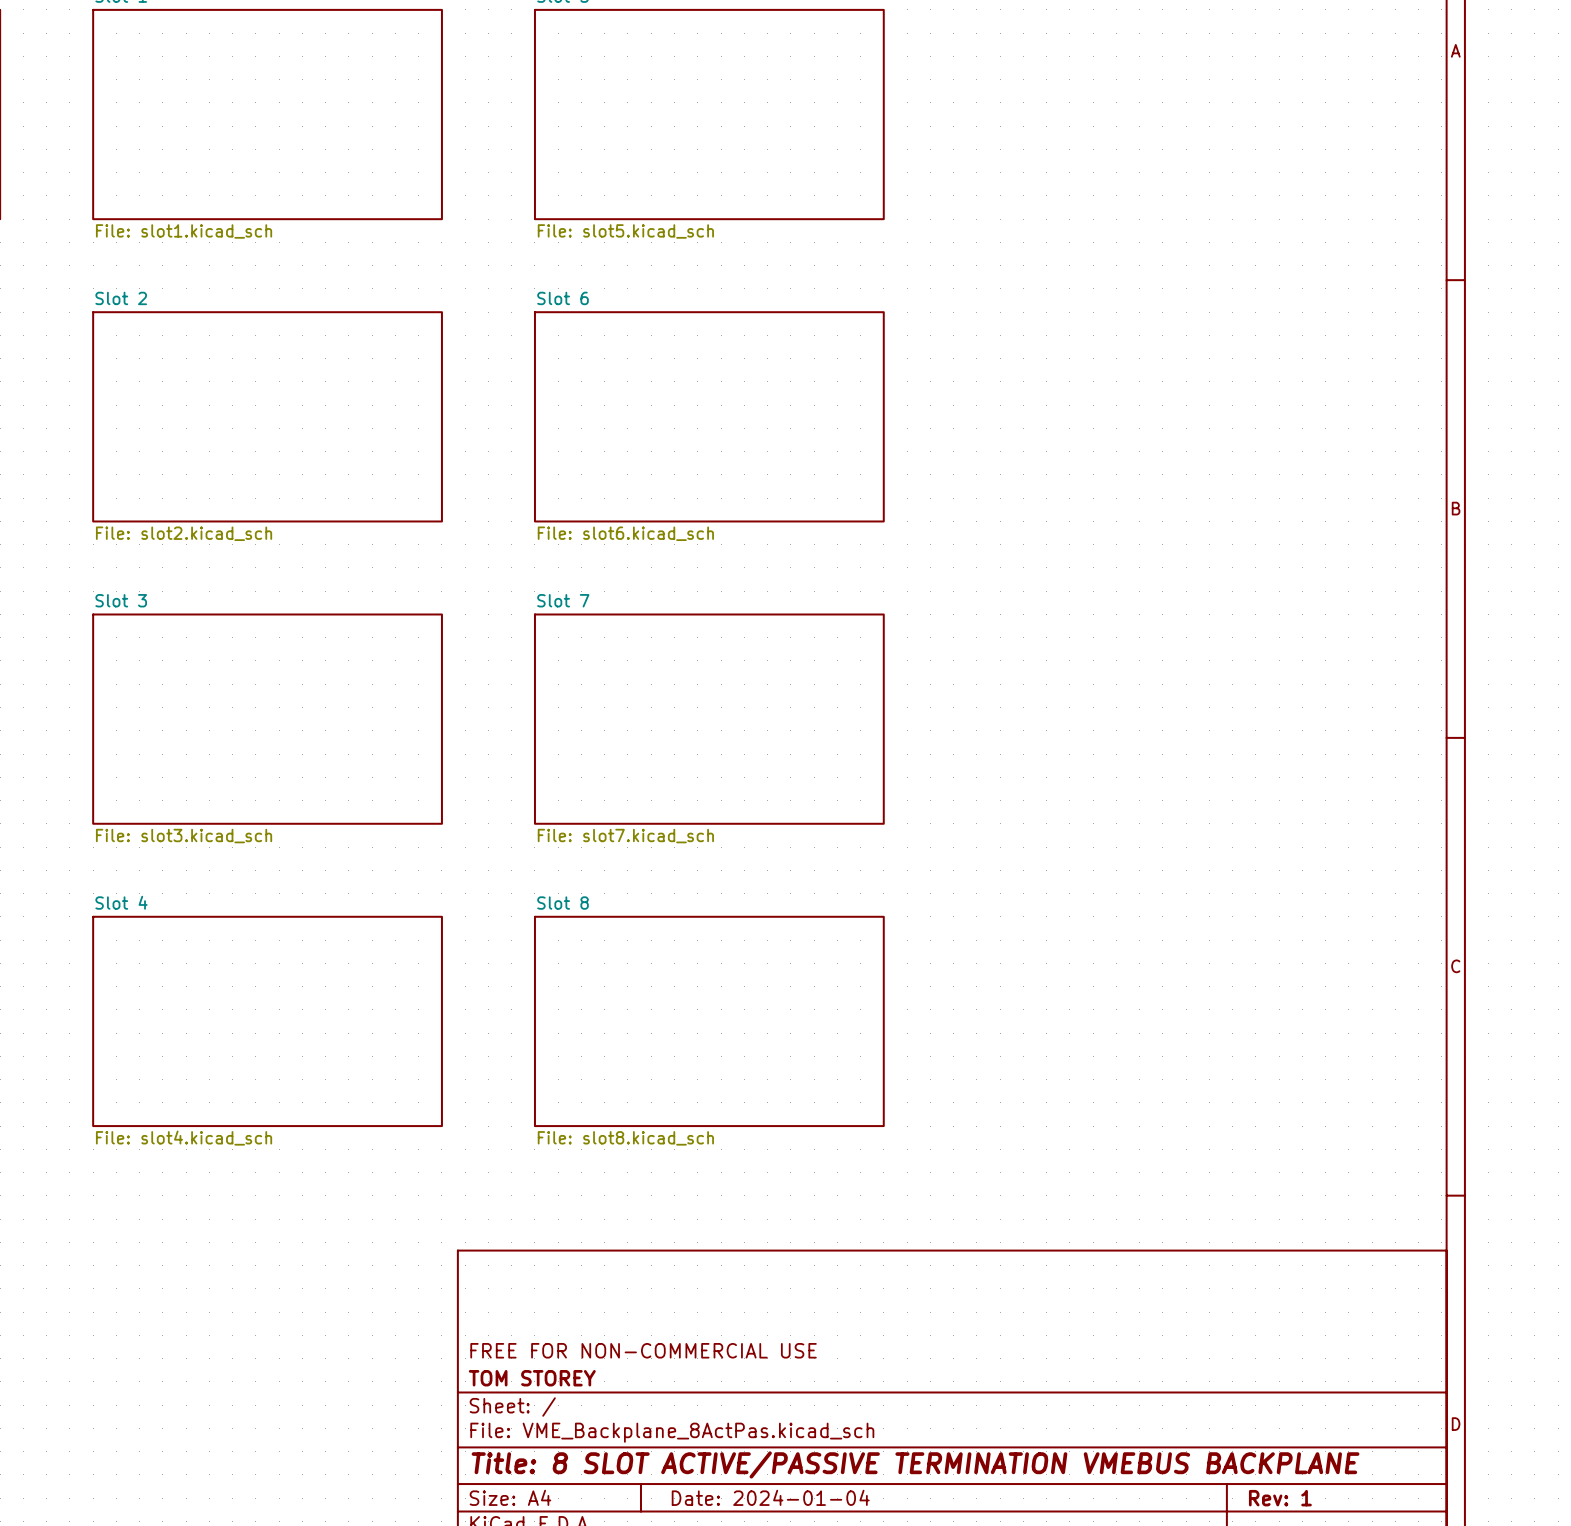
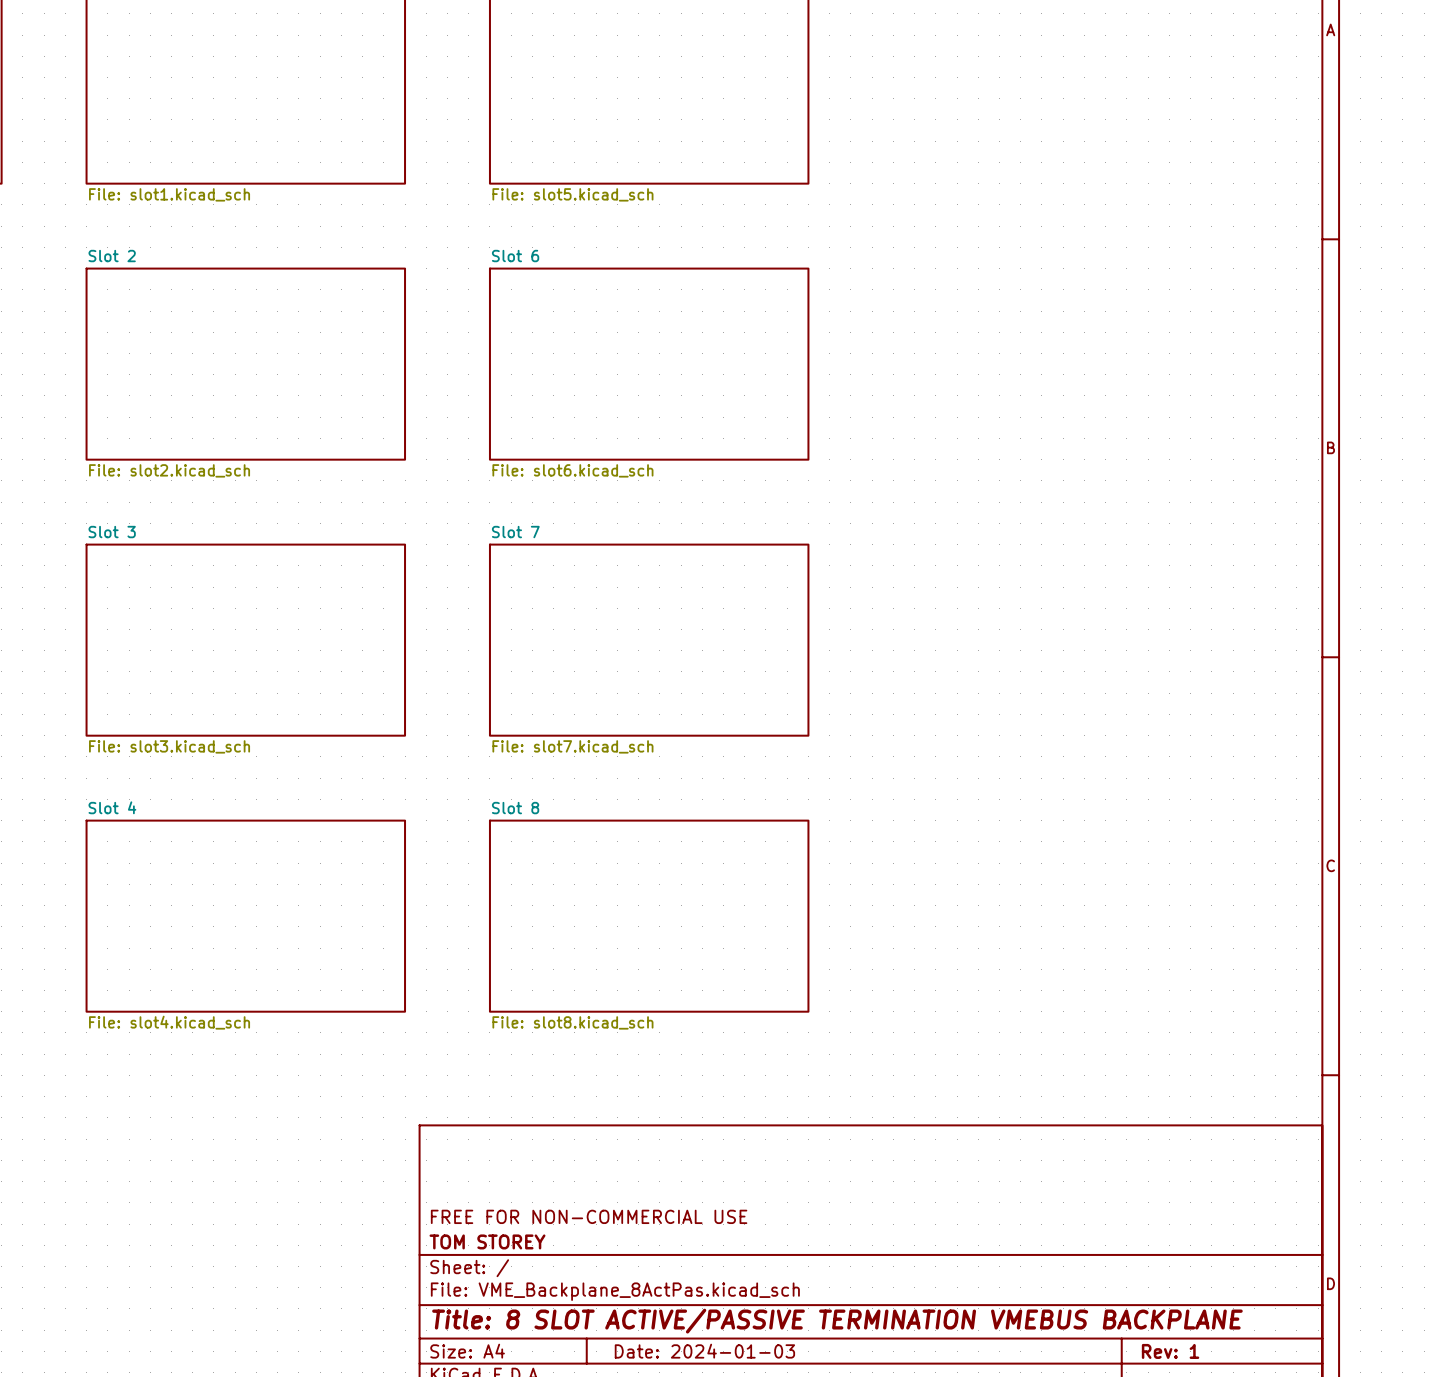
title block: Date: 2024-01-04 (770, 1497) -> Date: 2024-01-03 (704, 1351)

